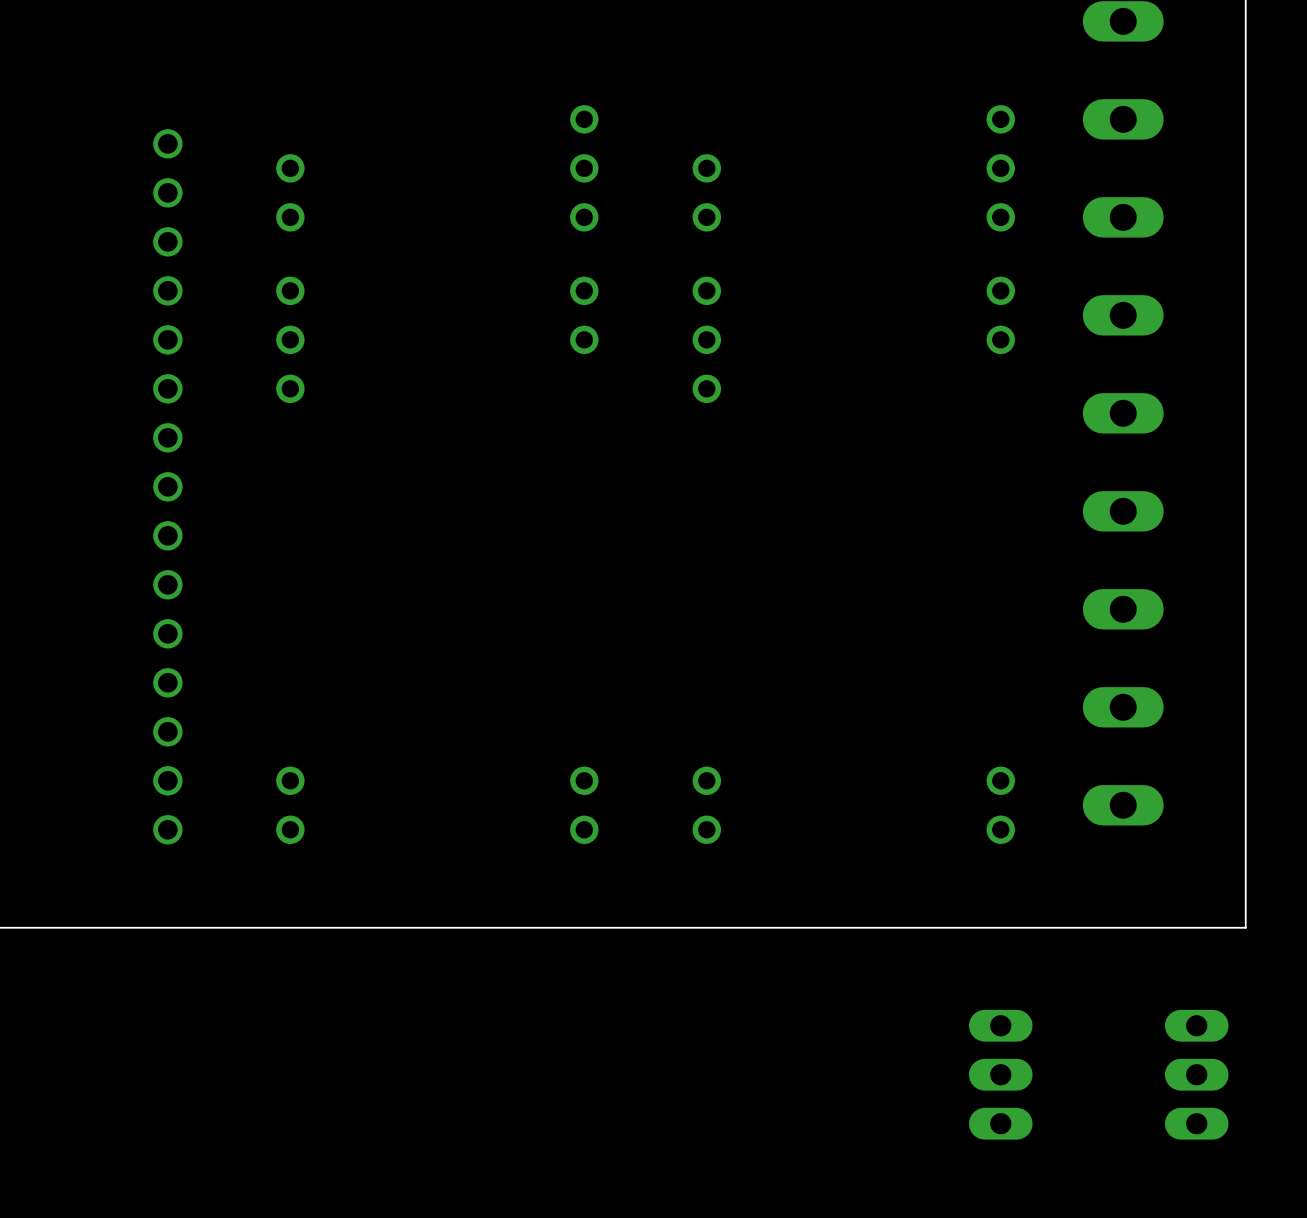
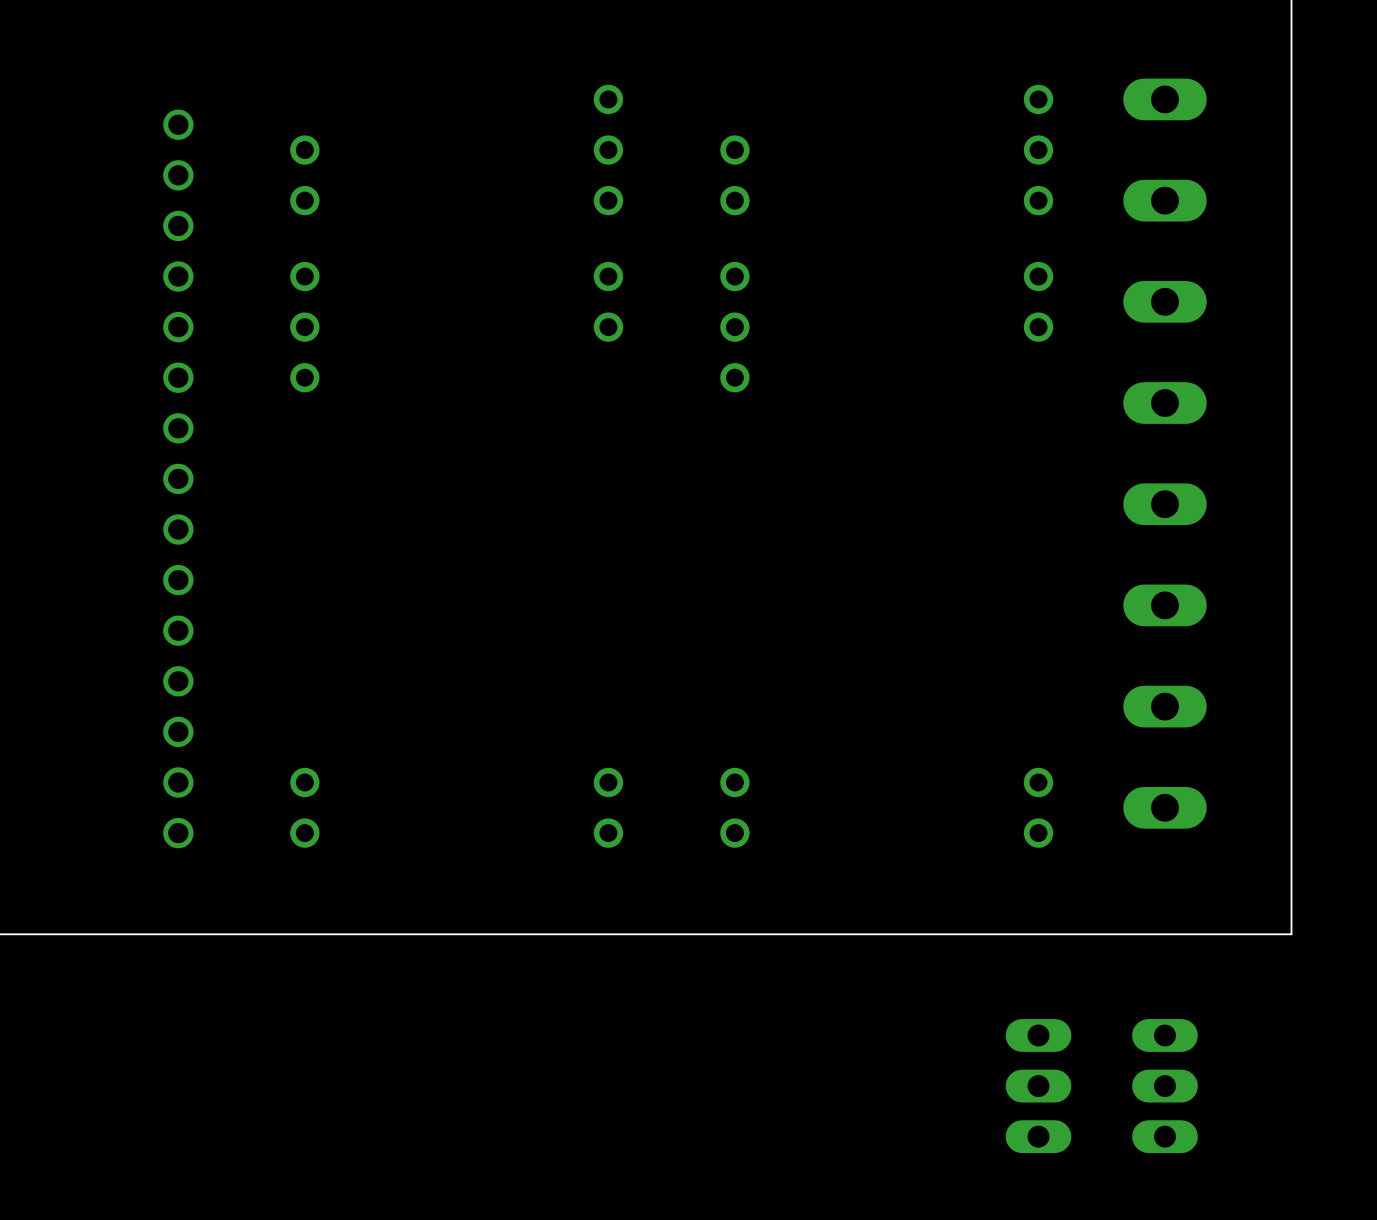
part position: (1196, 1074) -> (1164, 1086)

